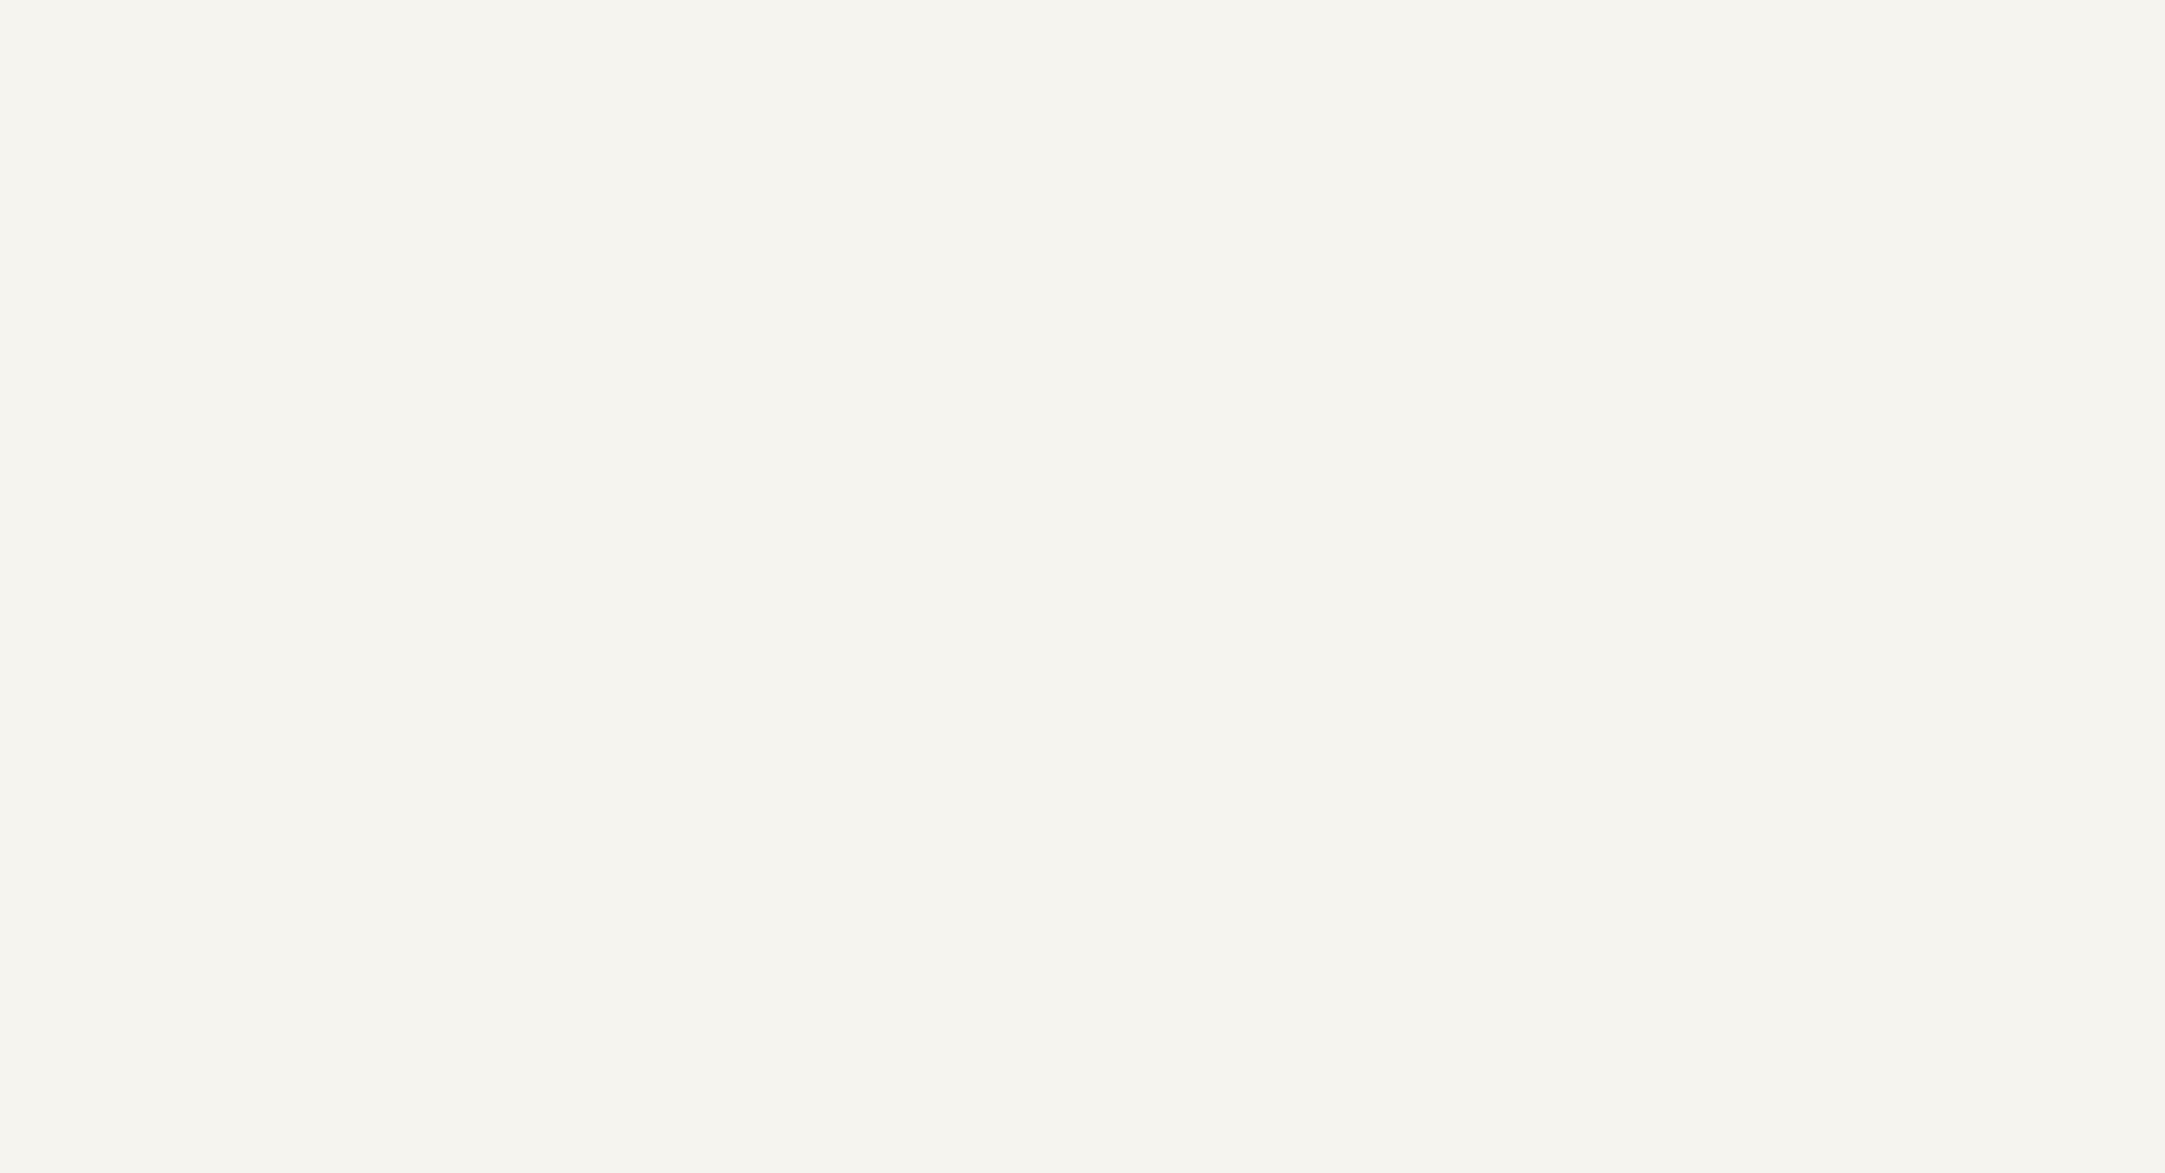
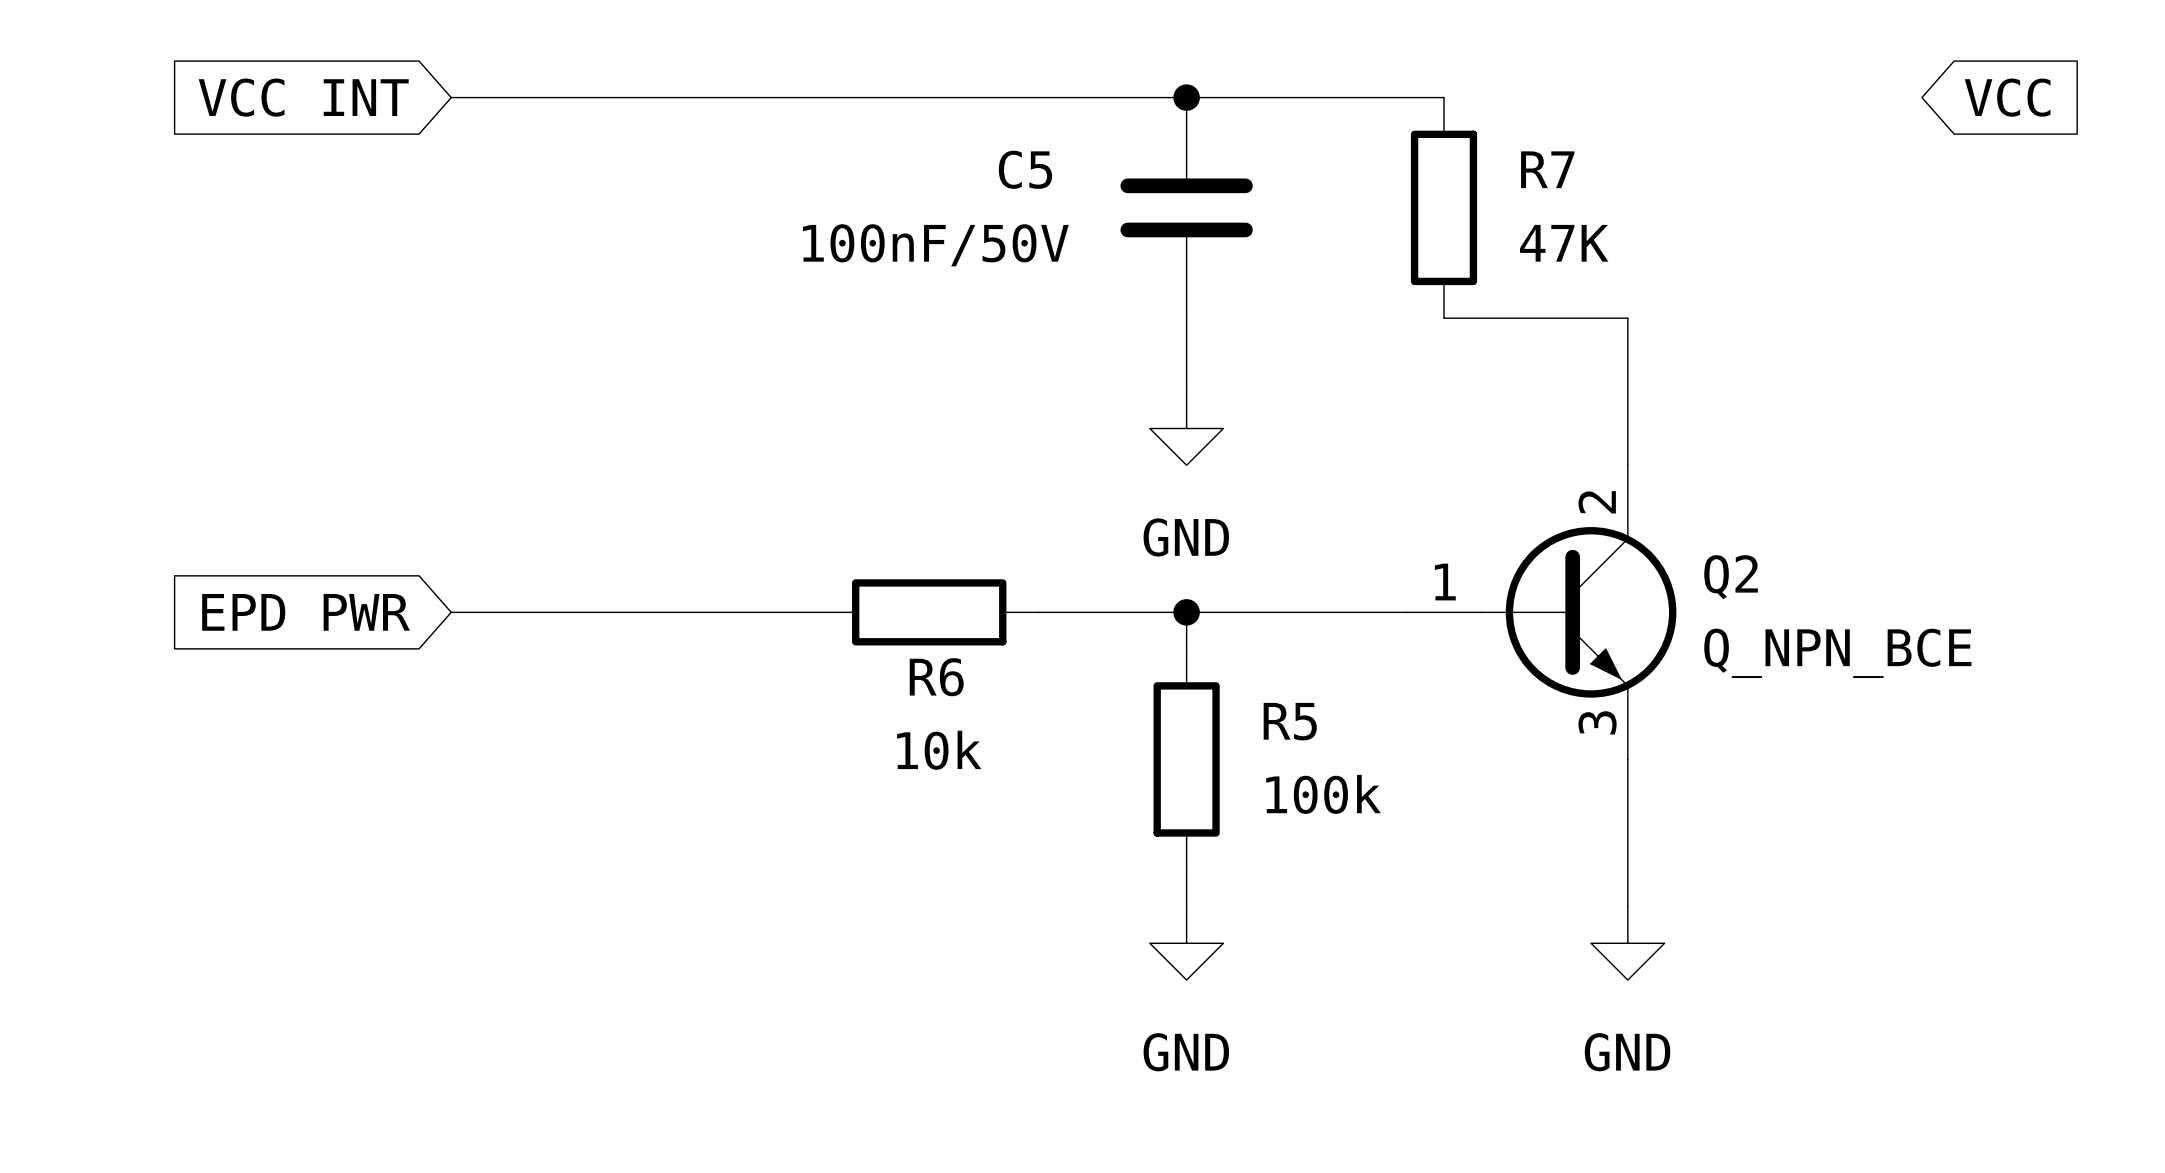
global label: none -> VCC INT (303, 97)
wire: none -> (451, 97) (1443, 97)
junction: none -> (1186, 97)
global label: none -> VCC (2007, 97)
C5: none -> 100nF/50V (1186, 207)
R7: none -> 47K (1443, 207)
wire: none -> (1186, 318) (1186, 391)
wire: none -> (1443, 318) (1627, 318) (1627, 465)
power symbol: none -> GND (1186, 428)
global label: none -> EPD PWR (306, 612)
wire: none -> (451, 612) (818, 612)
R6: none -> 10k (929, 612)
wire: none -> (1039, 612) (1407, 612)
wire: none -> (1186, 612) (1186, 649)
junction: none -> (1186, 612)
Q2: none -> Q_NPN_BCE (1541, 612)
R5: none -> 100k (1186, 759)
wire: none -> (1627, 759) (1627, 906)
wire: none -> (1186, 869) (1186, 906)
power symbol: none -> GND (1186, 943)
power symbol: none -> GND (1627, 943)

